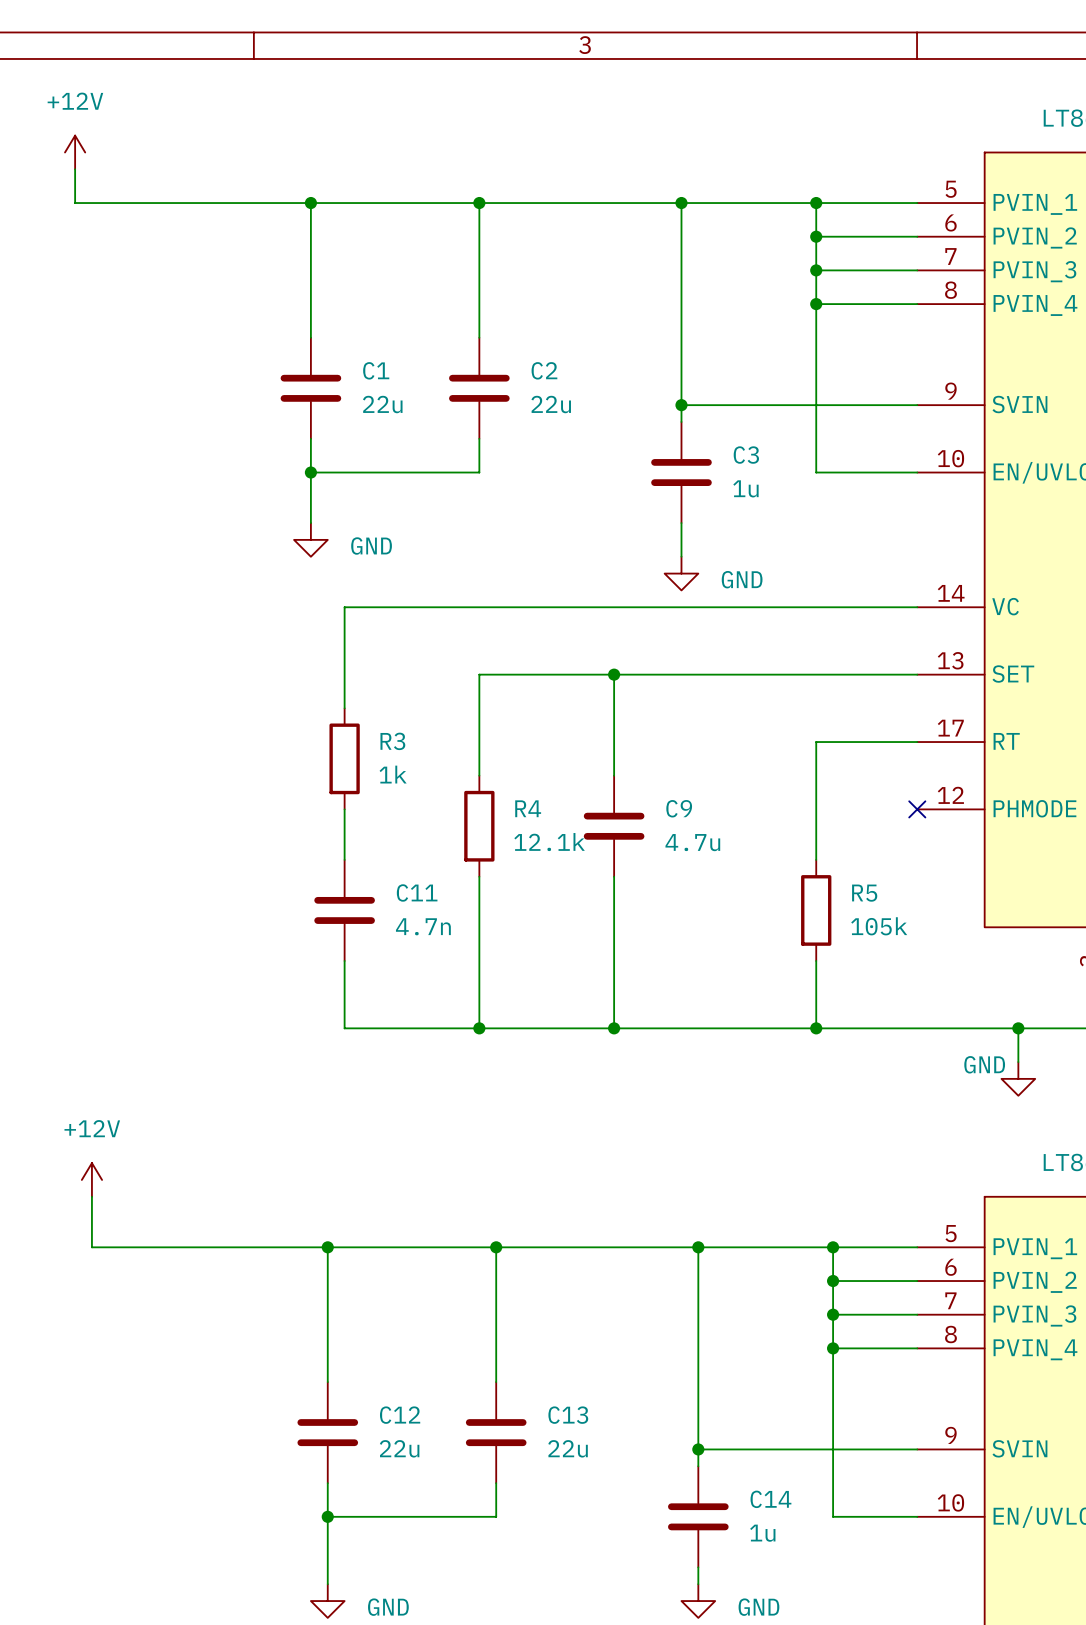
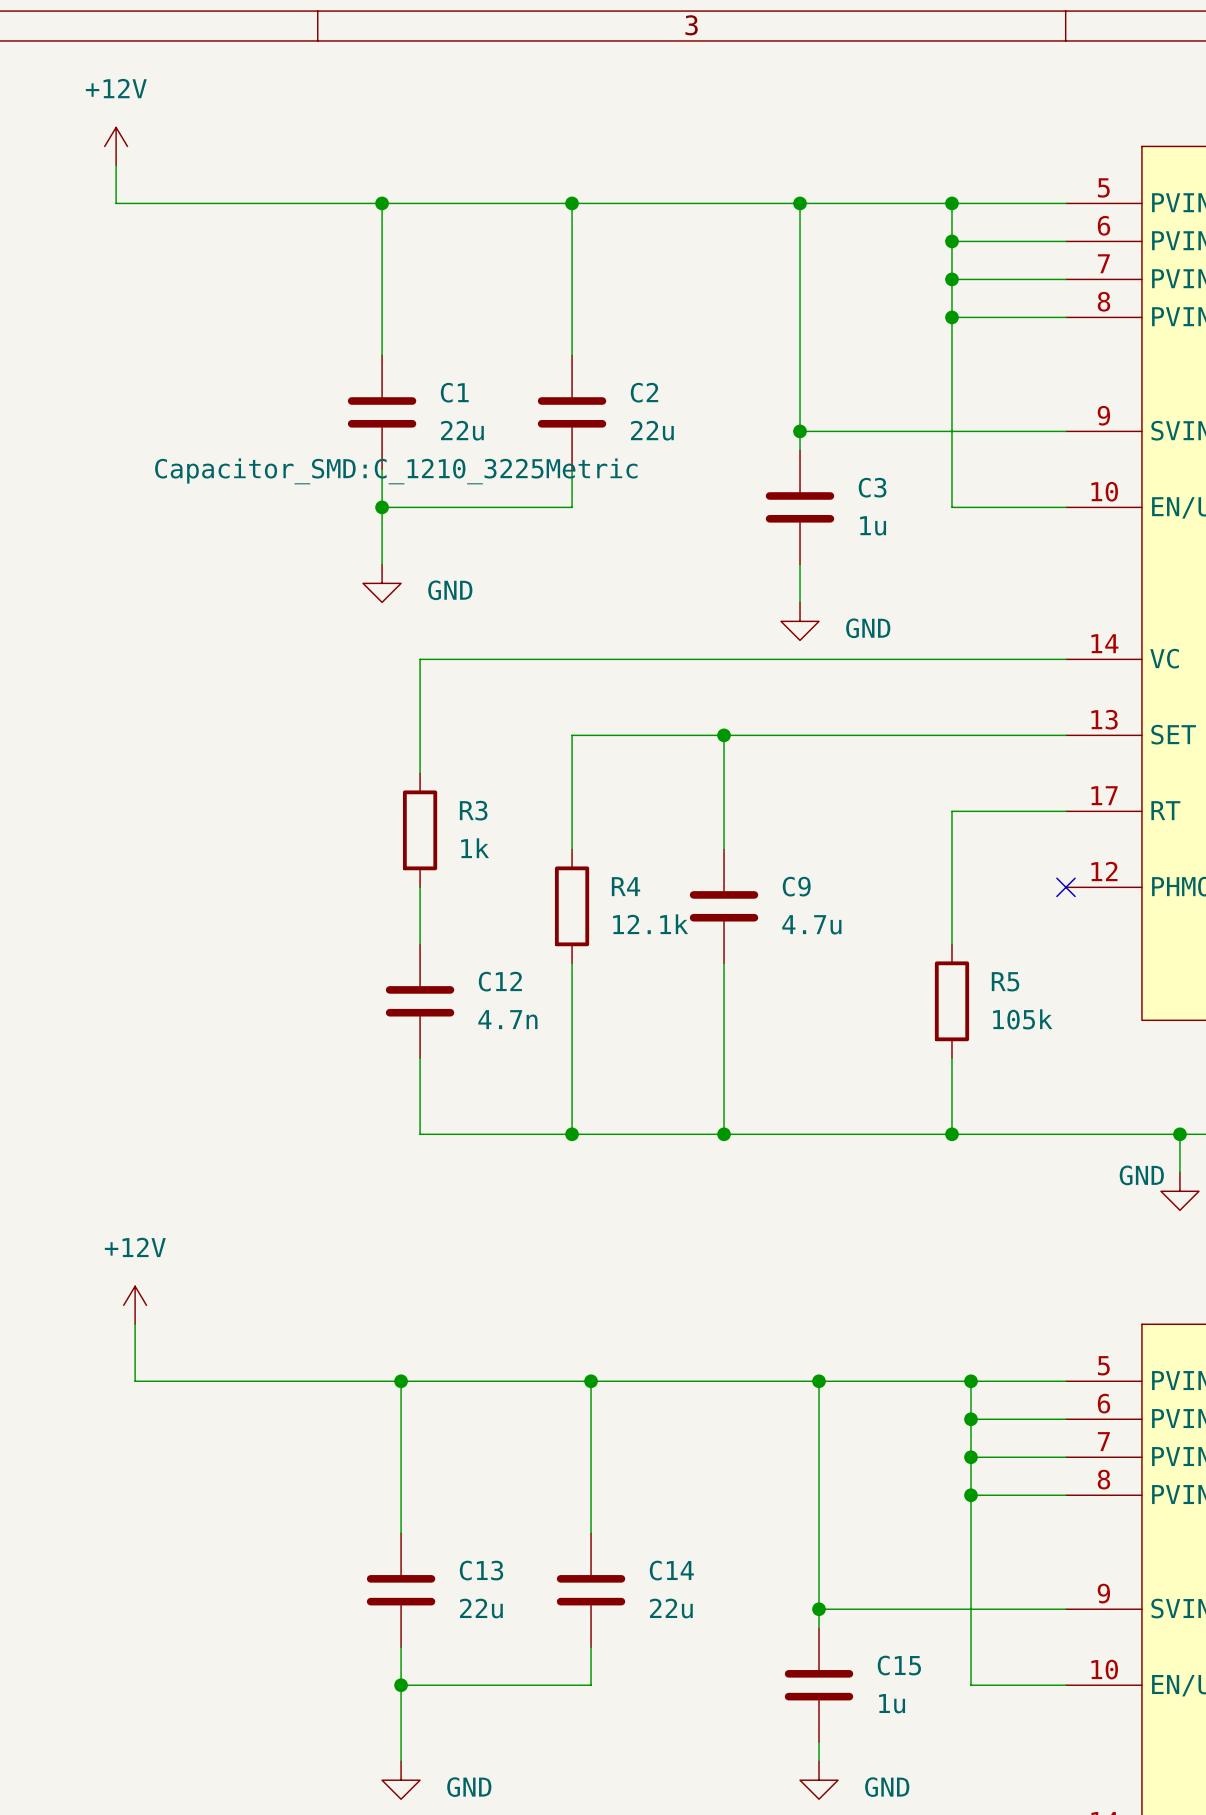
C1 text: none -> Capacitor_SMD:C_1210_3225Metric (396, 471)
C11 name: C11 (417, 892) -> C12 (500, 981)
C12 name: C12 (400, 1415) -> C13 (481, 1570)
C13 name: C13 (568, 1415) -> C14 (671, 1570)
C14 name: C14 (770, 1499) -> C15 (899, 1665)

